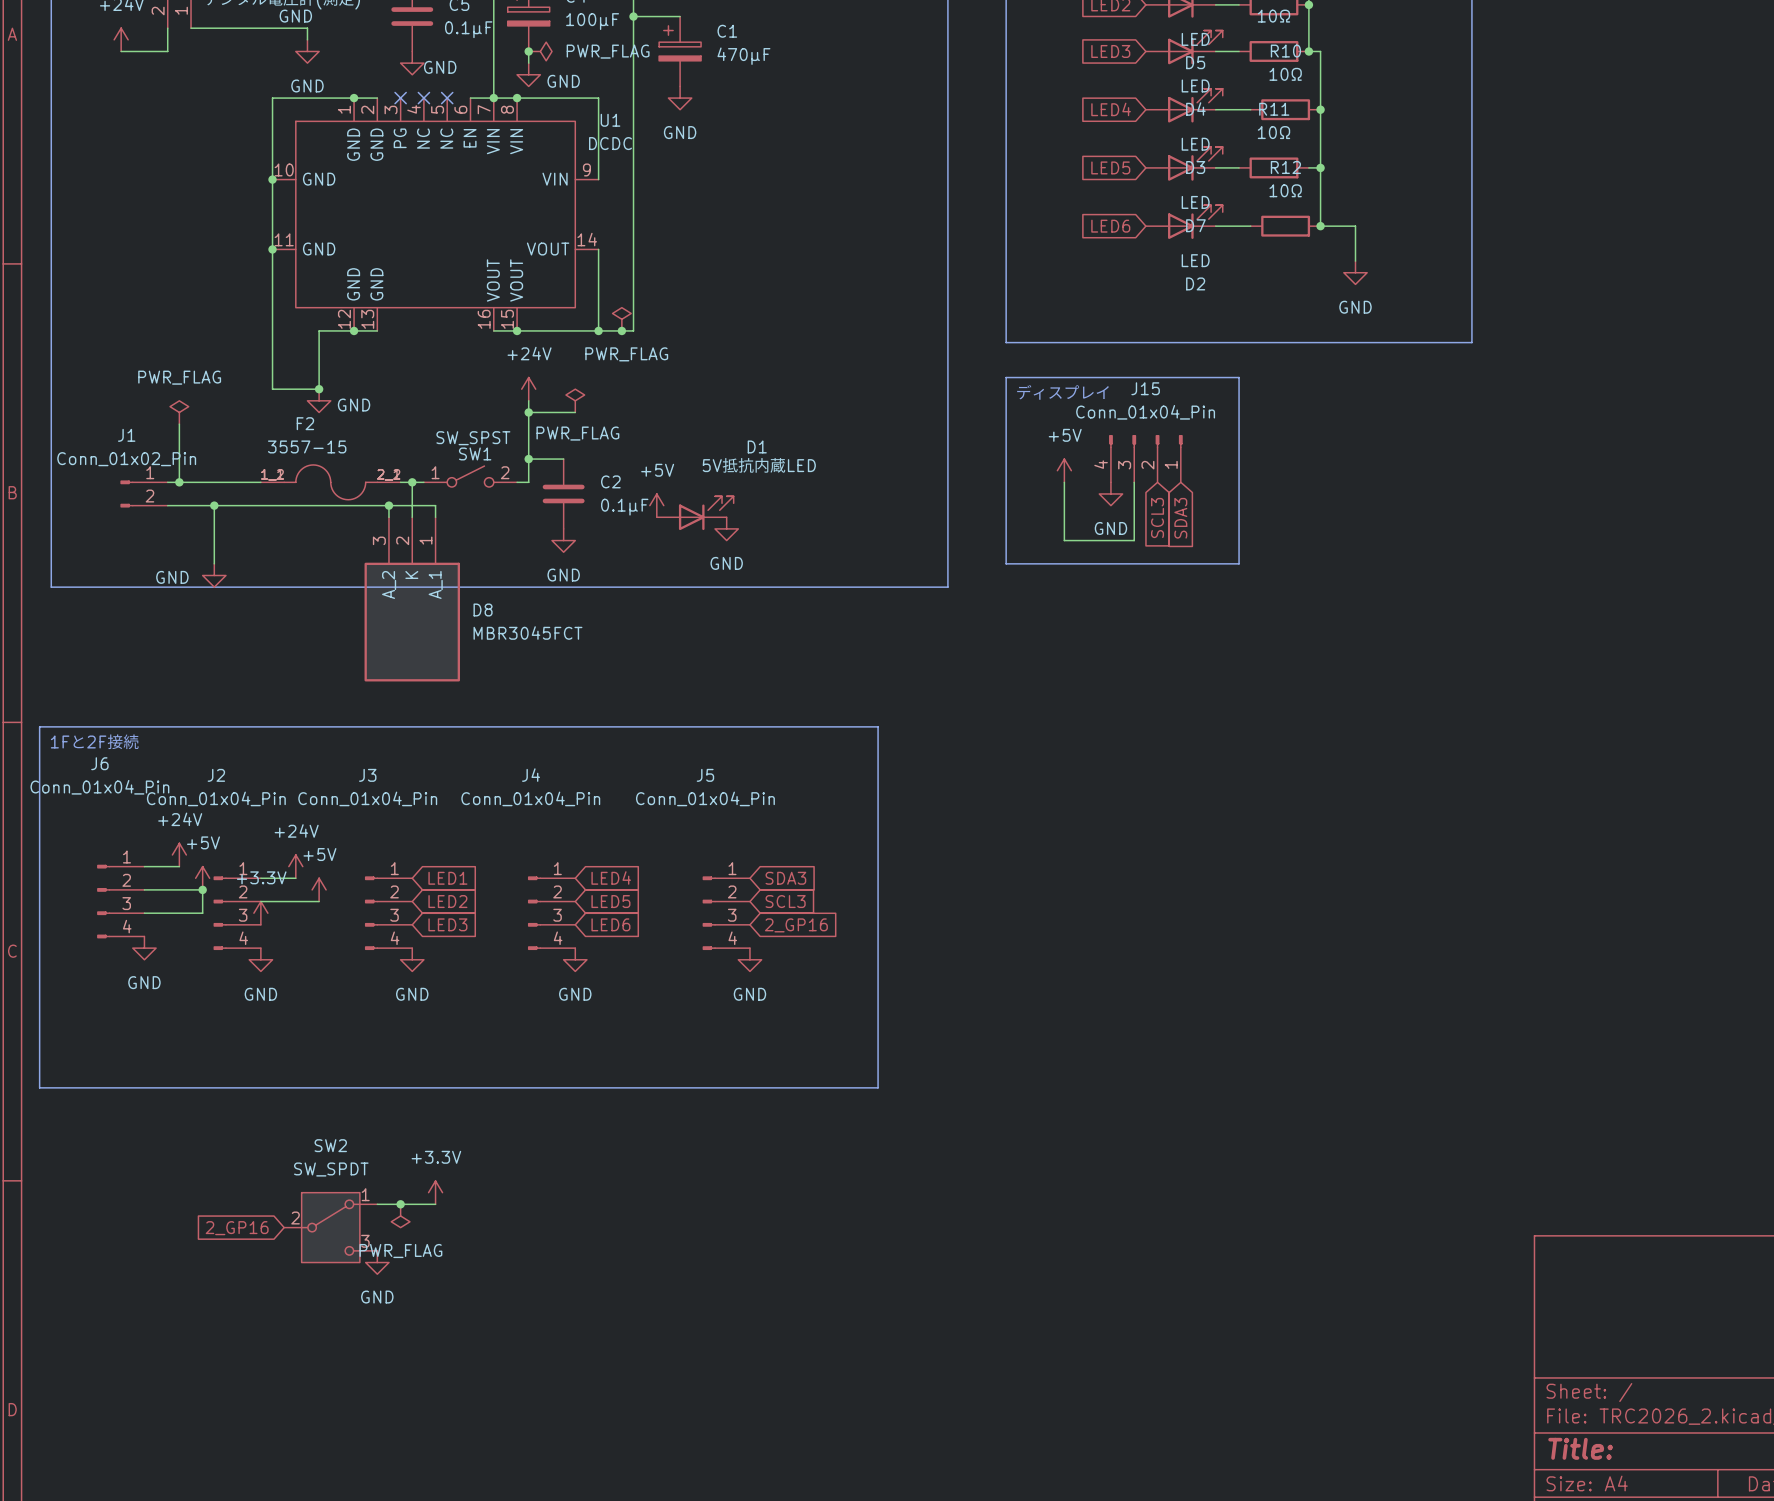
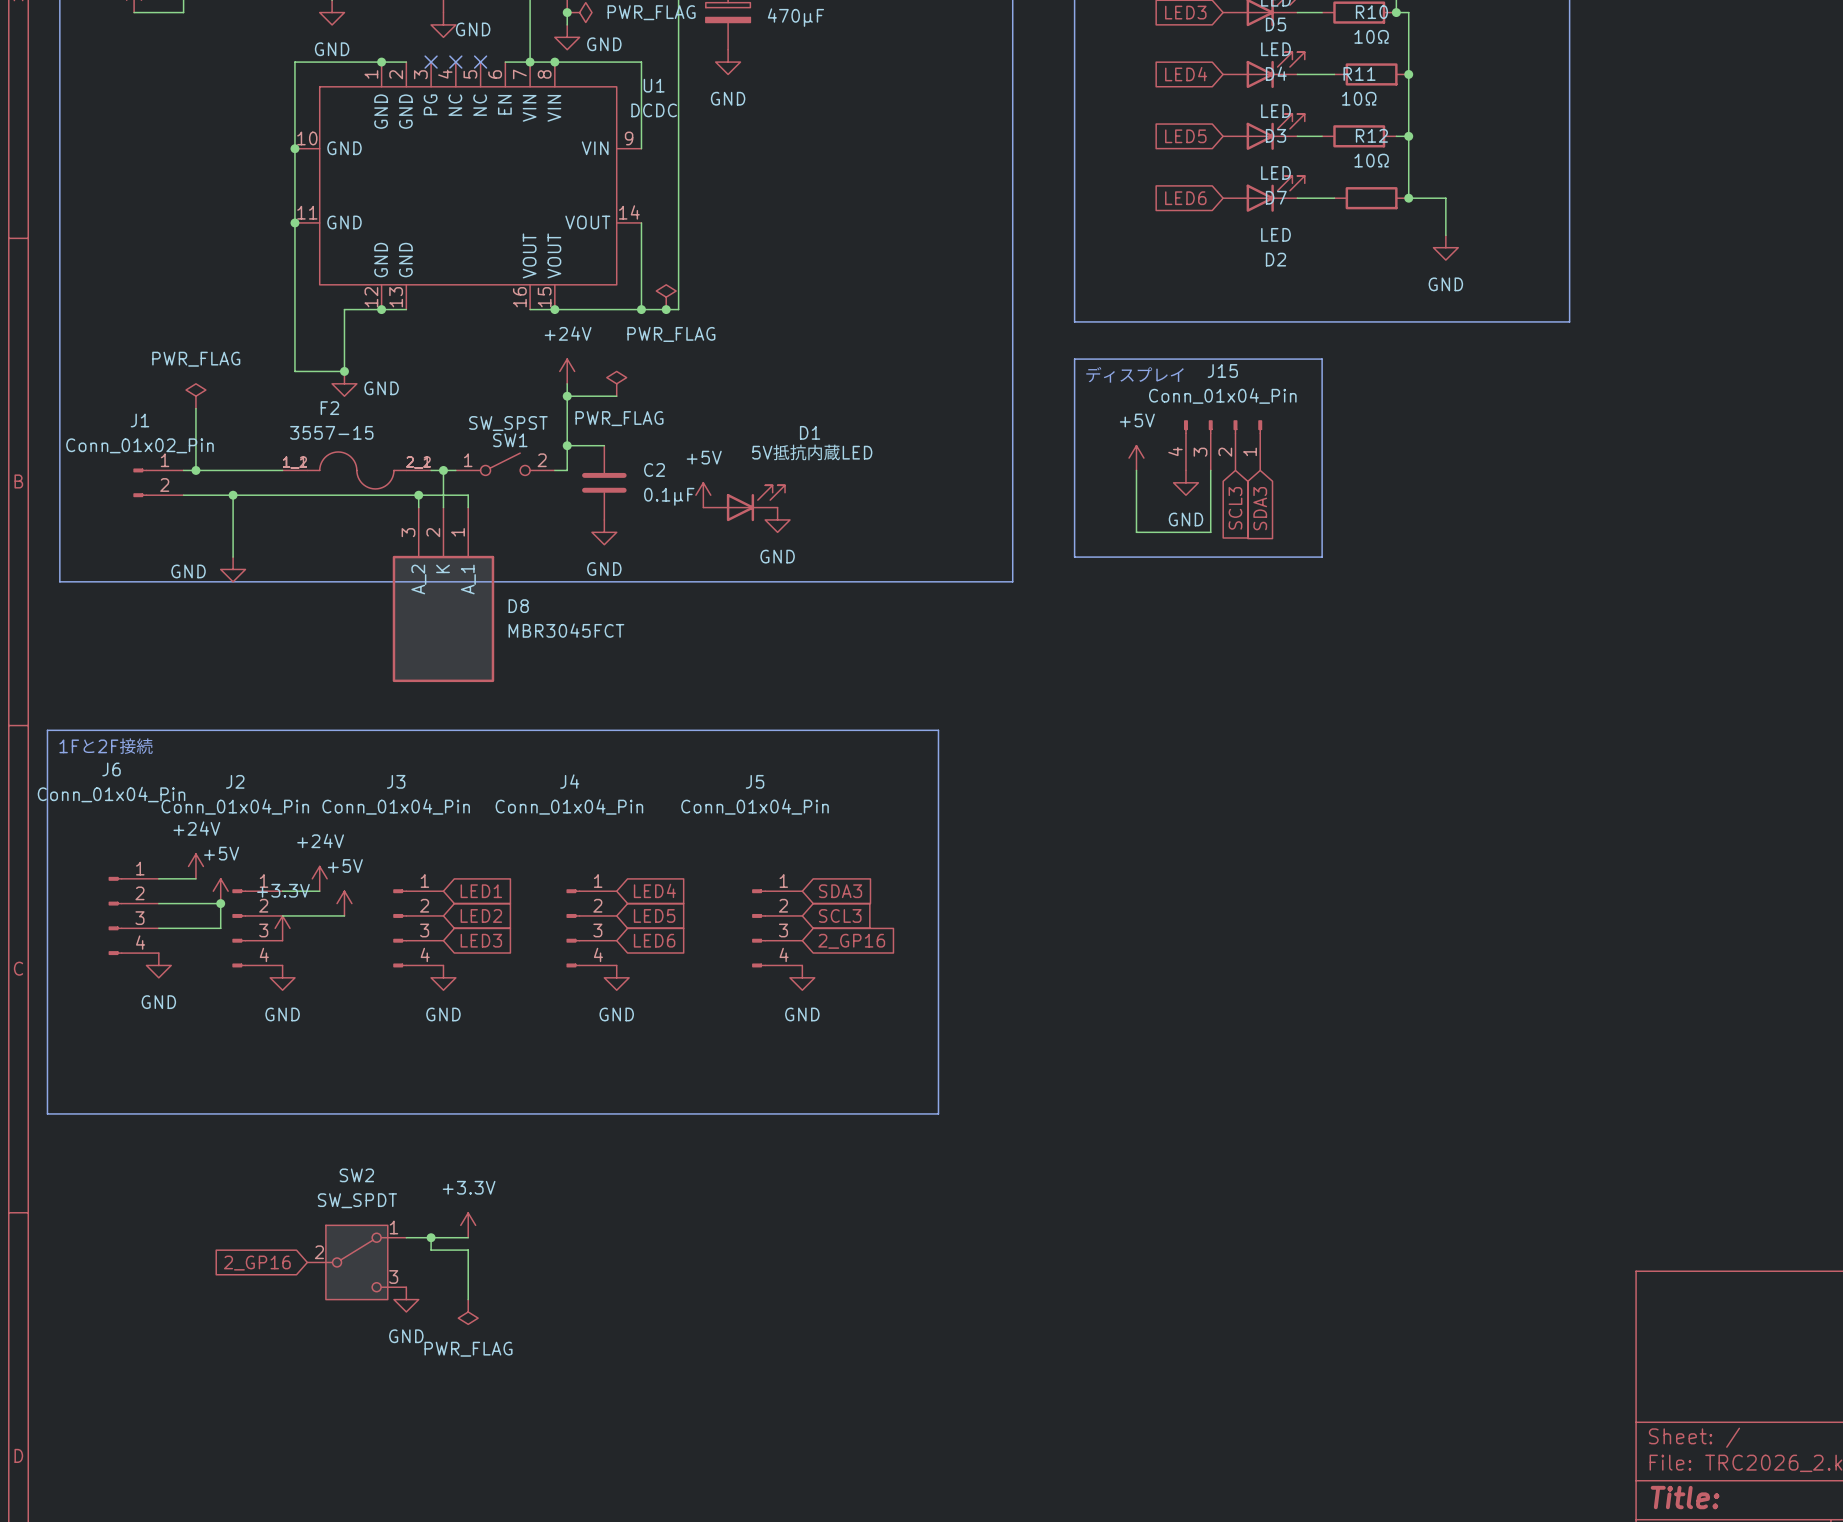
wire: none -> (431, 1237) (431, 1250) (468, 1250) (468, 1299)
power symbol position: PWR_FLAG (400, 1215) -> PWR_FLAG (468, 1311)

